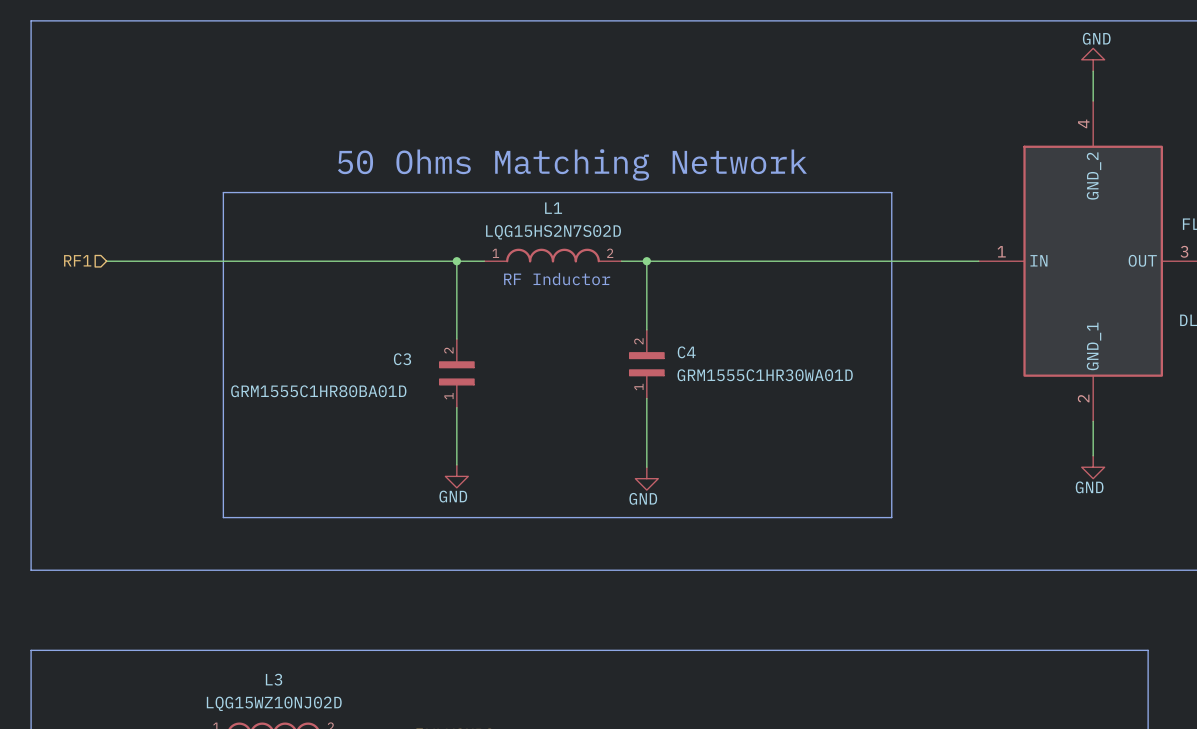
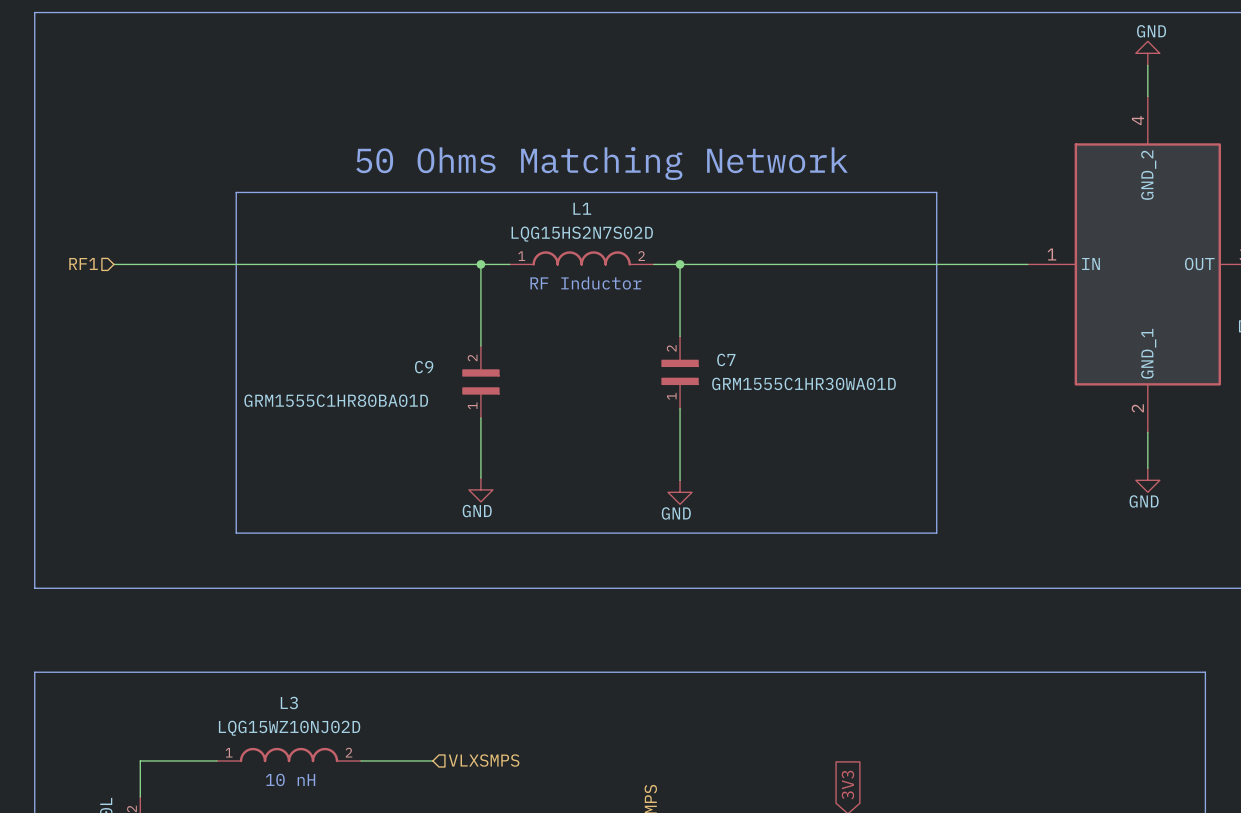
C4 name: C4 (686, 352) -> C7 (726, 359)
C3 name: C3 (402, 359) -> C9 (424, 367)

